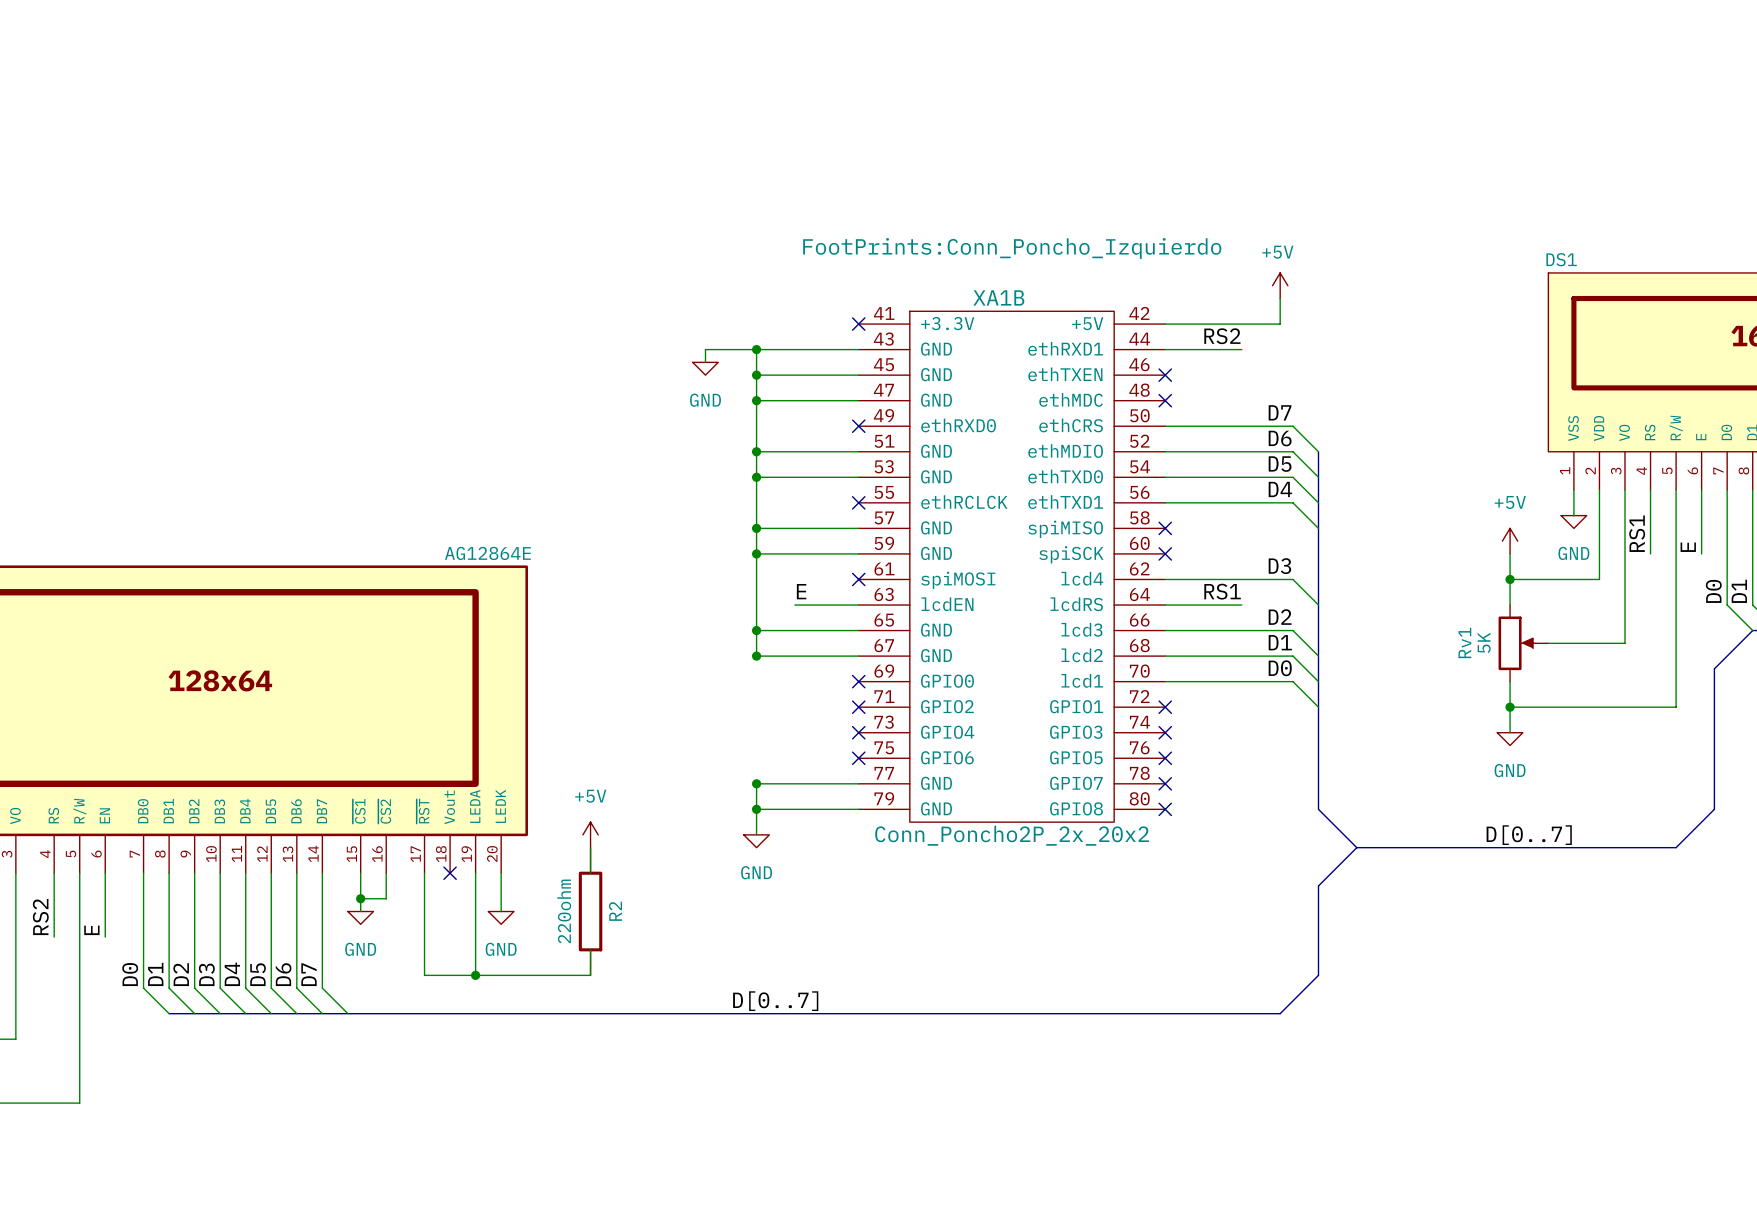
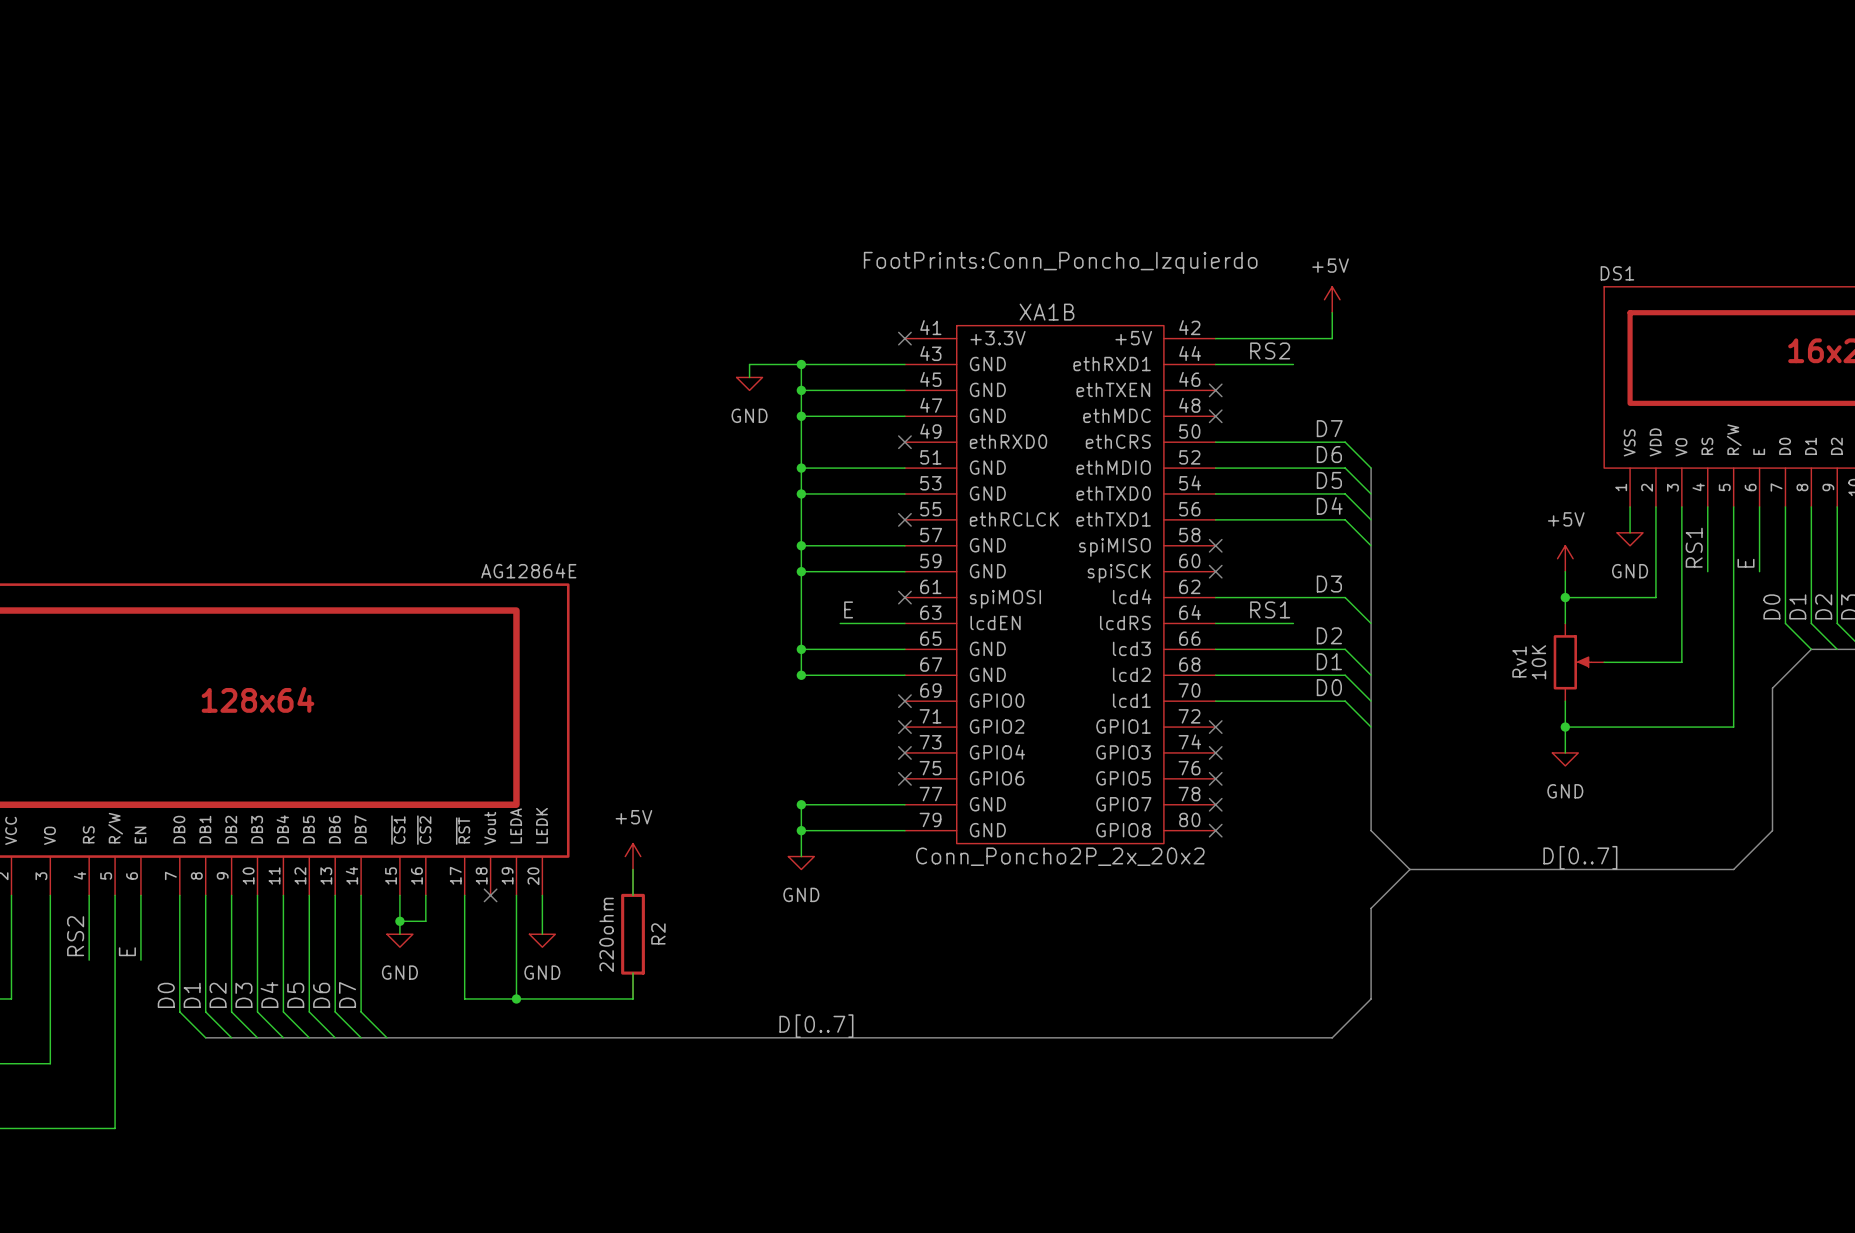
Rv1 value: 5K (1484, 642) -> 10K (1538, 662)

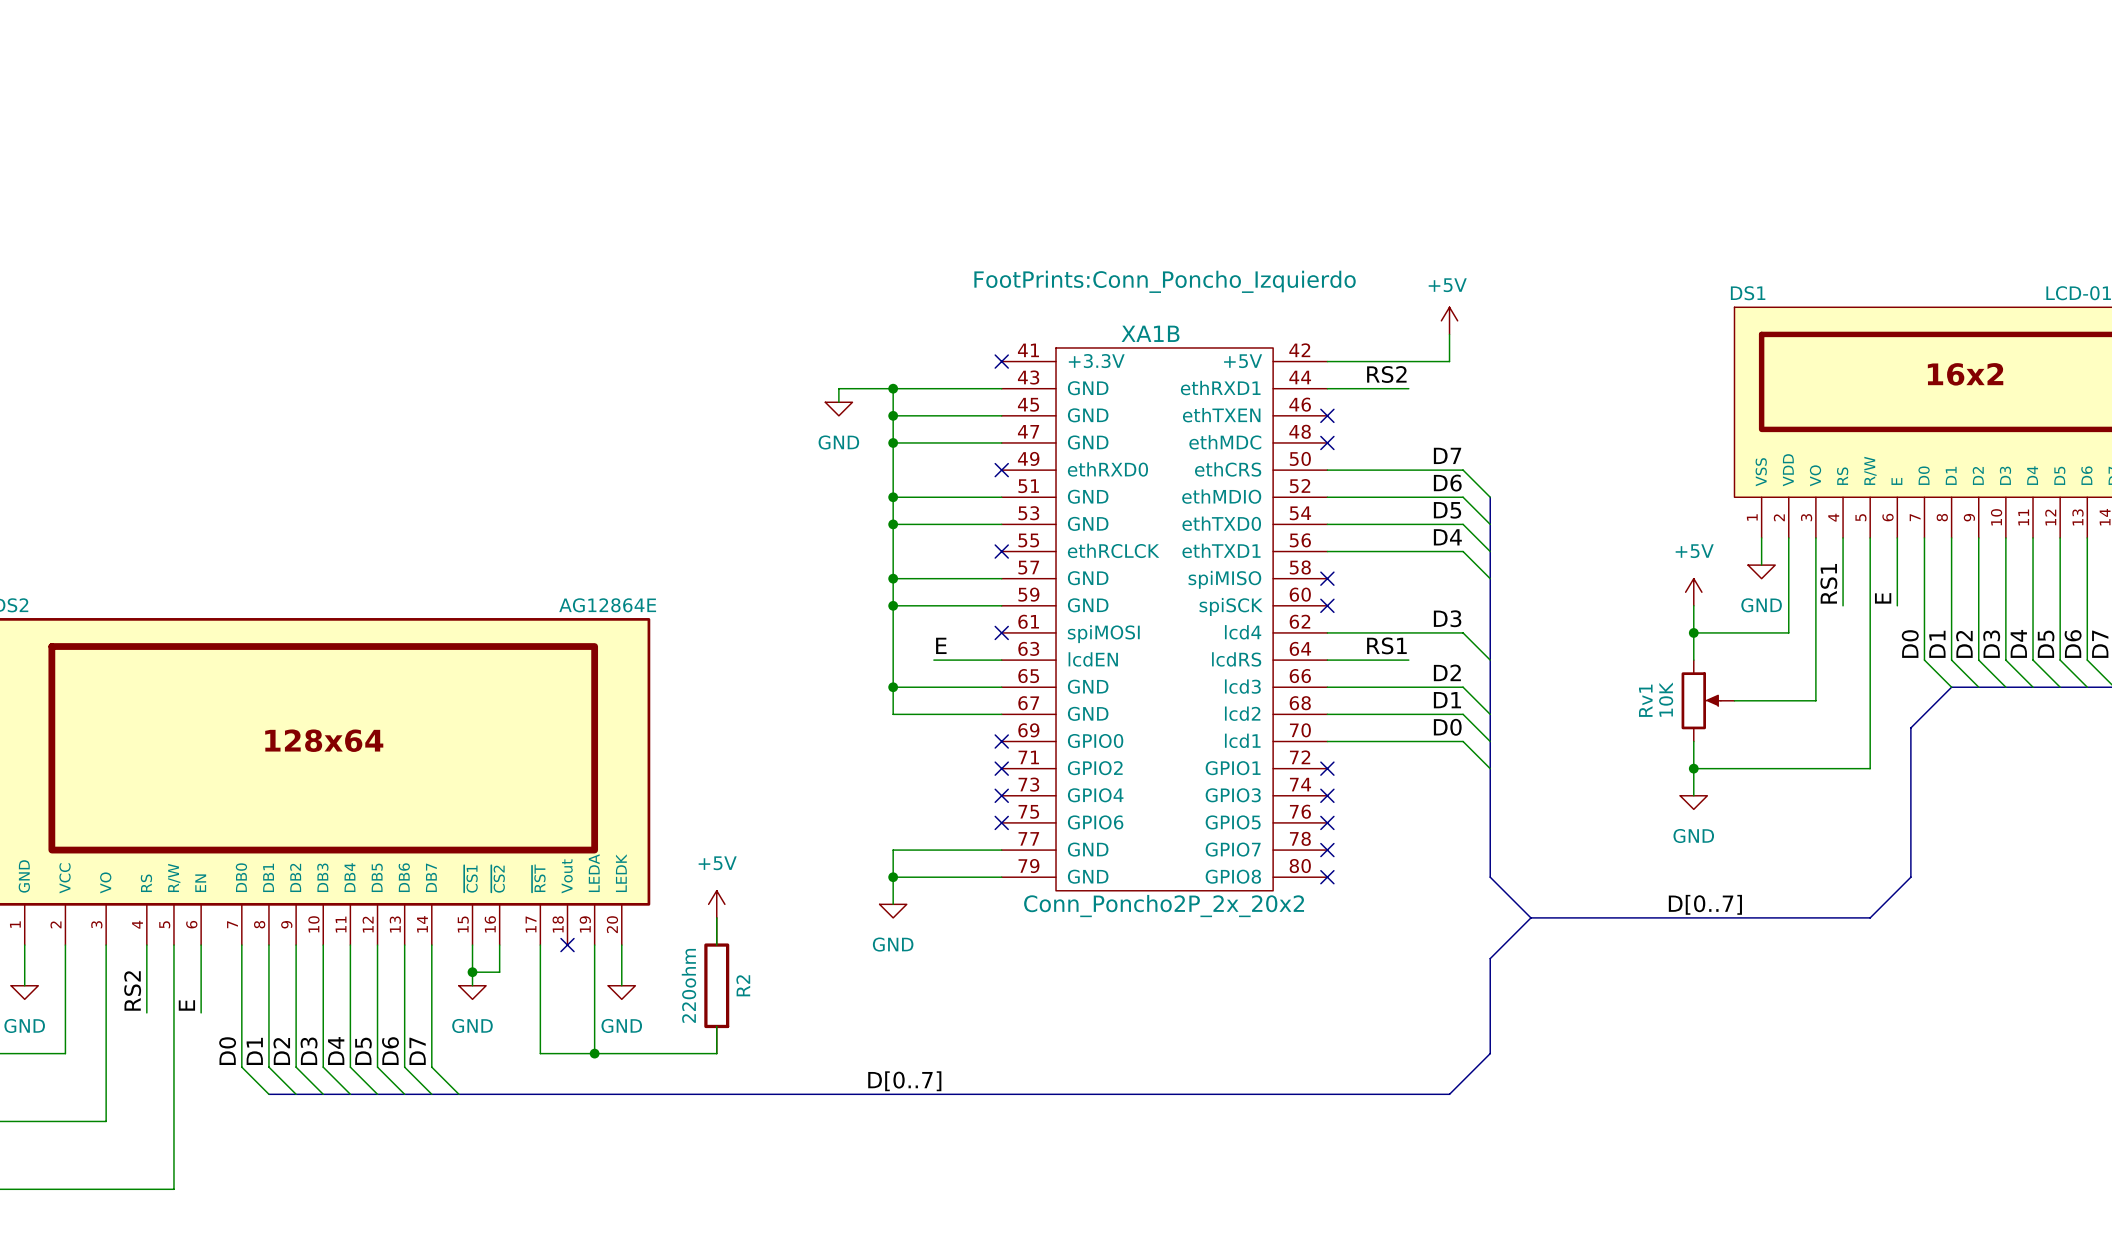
junction: (801, 675) -> none
junction: (801, 804) -> none

